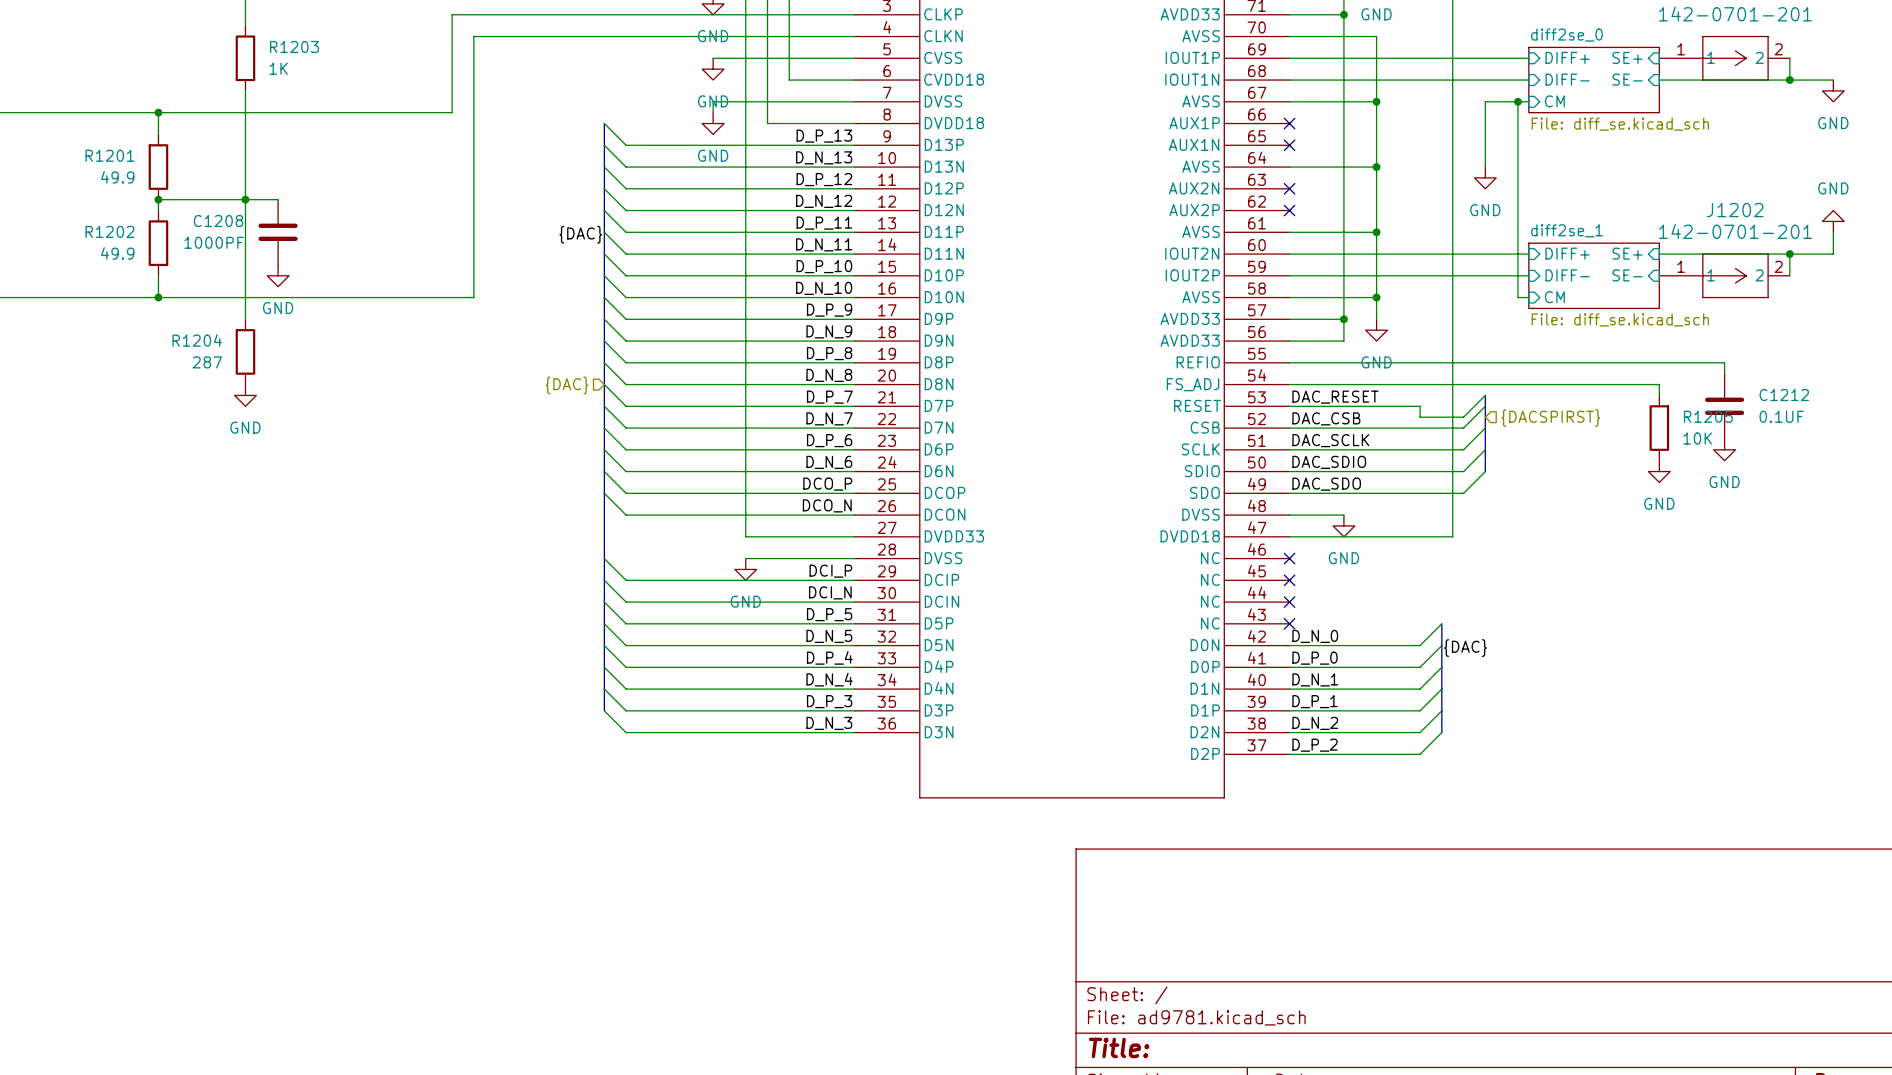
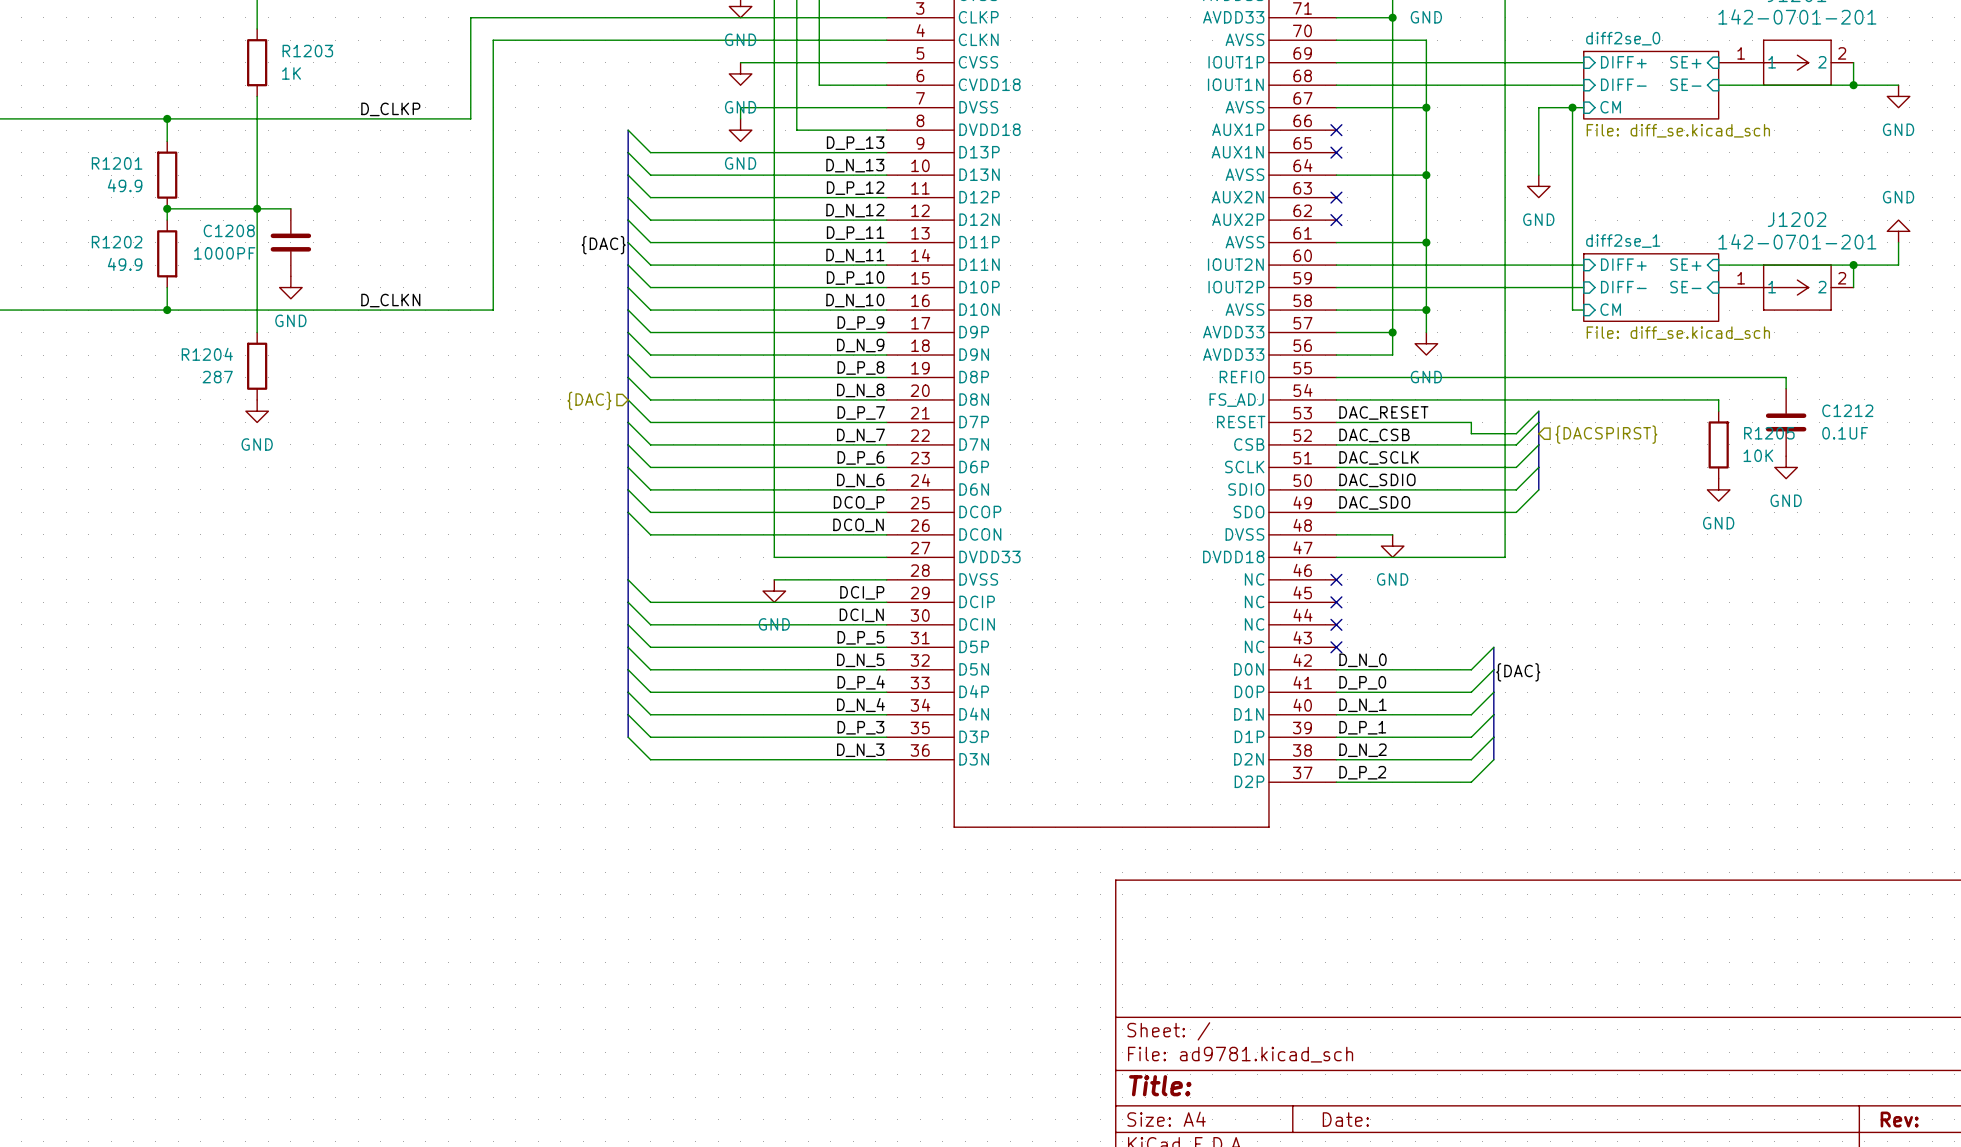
label: none -> D_CLKP (390, 109)
label: none -> D_CLKN (390, 300)

